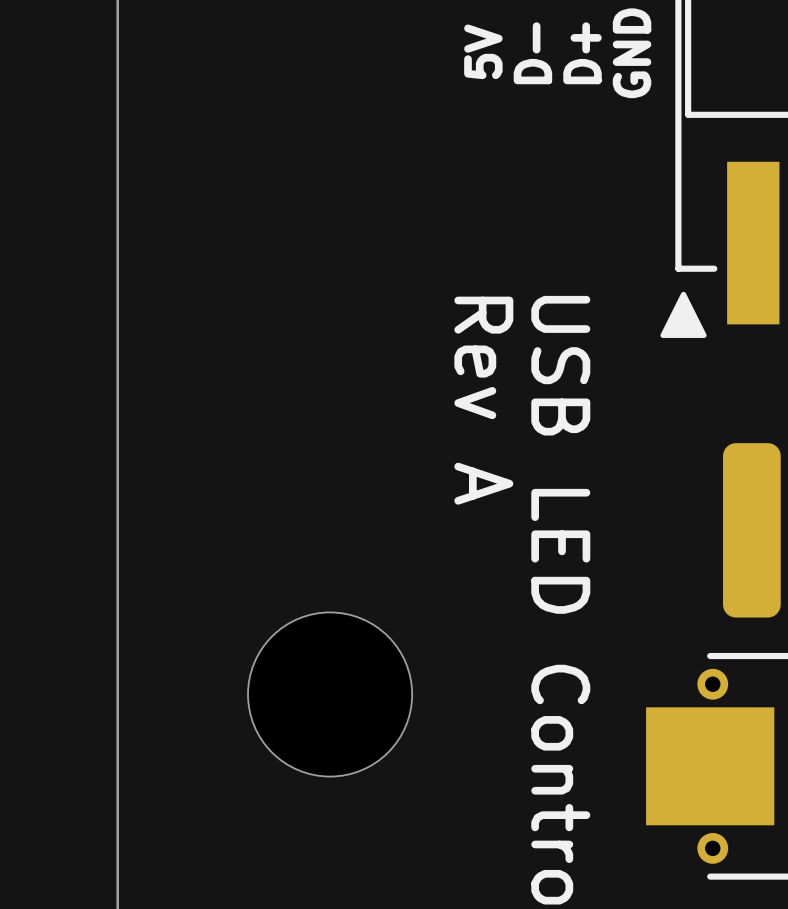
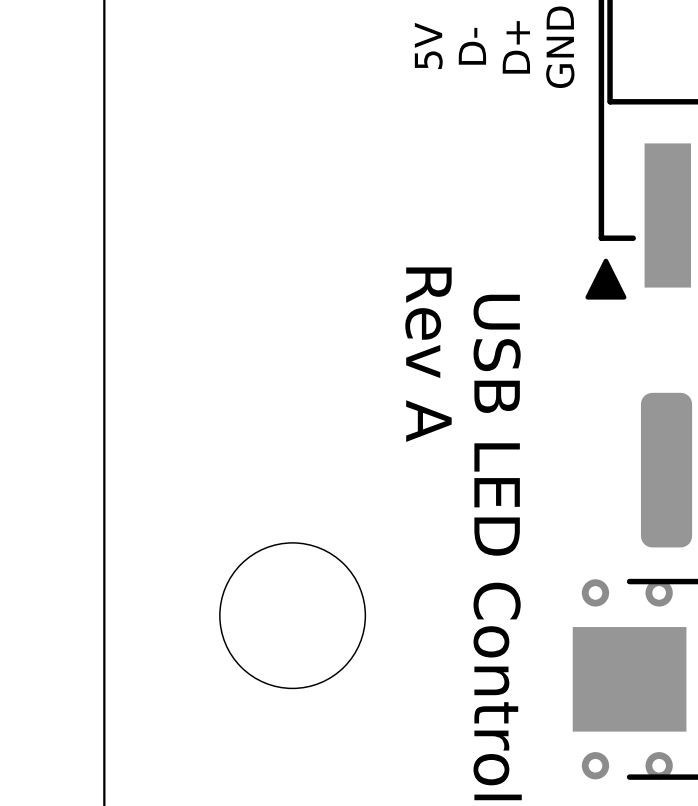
part: none -> (595, 592)
part: none -> (659, 592)
part: (712, 684) -> none
part: (712, 848) -> none
part: none -> (595, 765)
part: none -> (659, 765)

